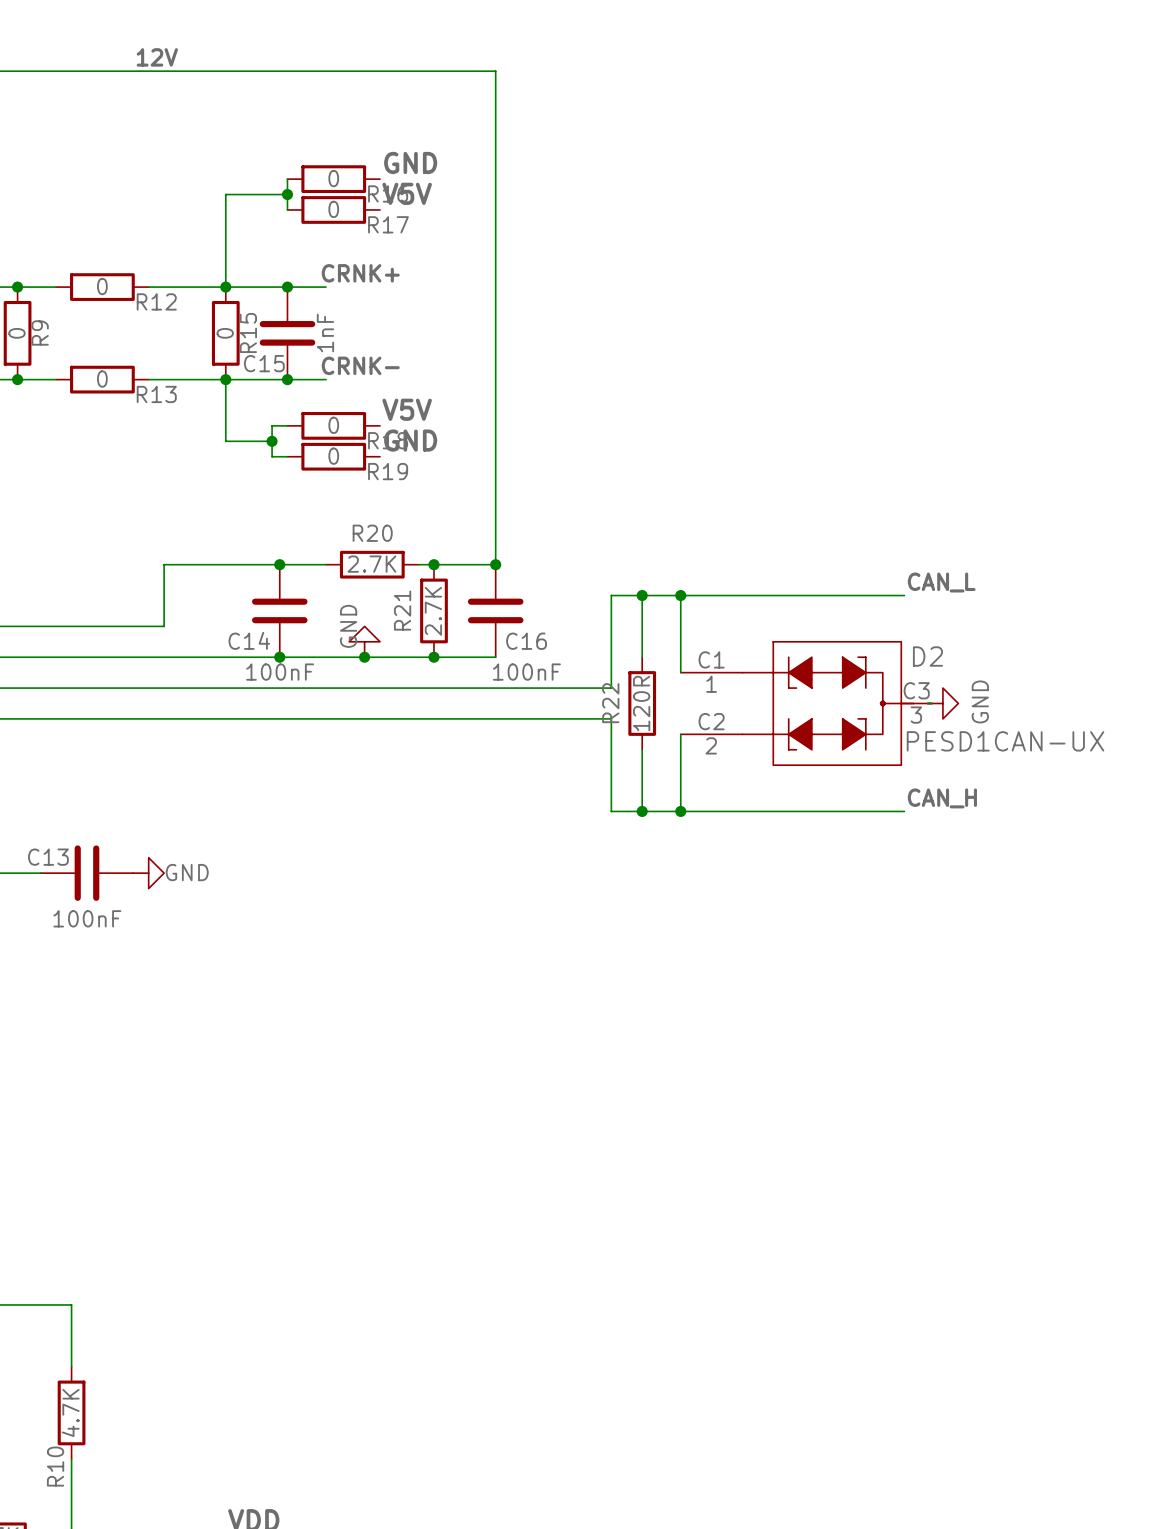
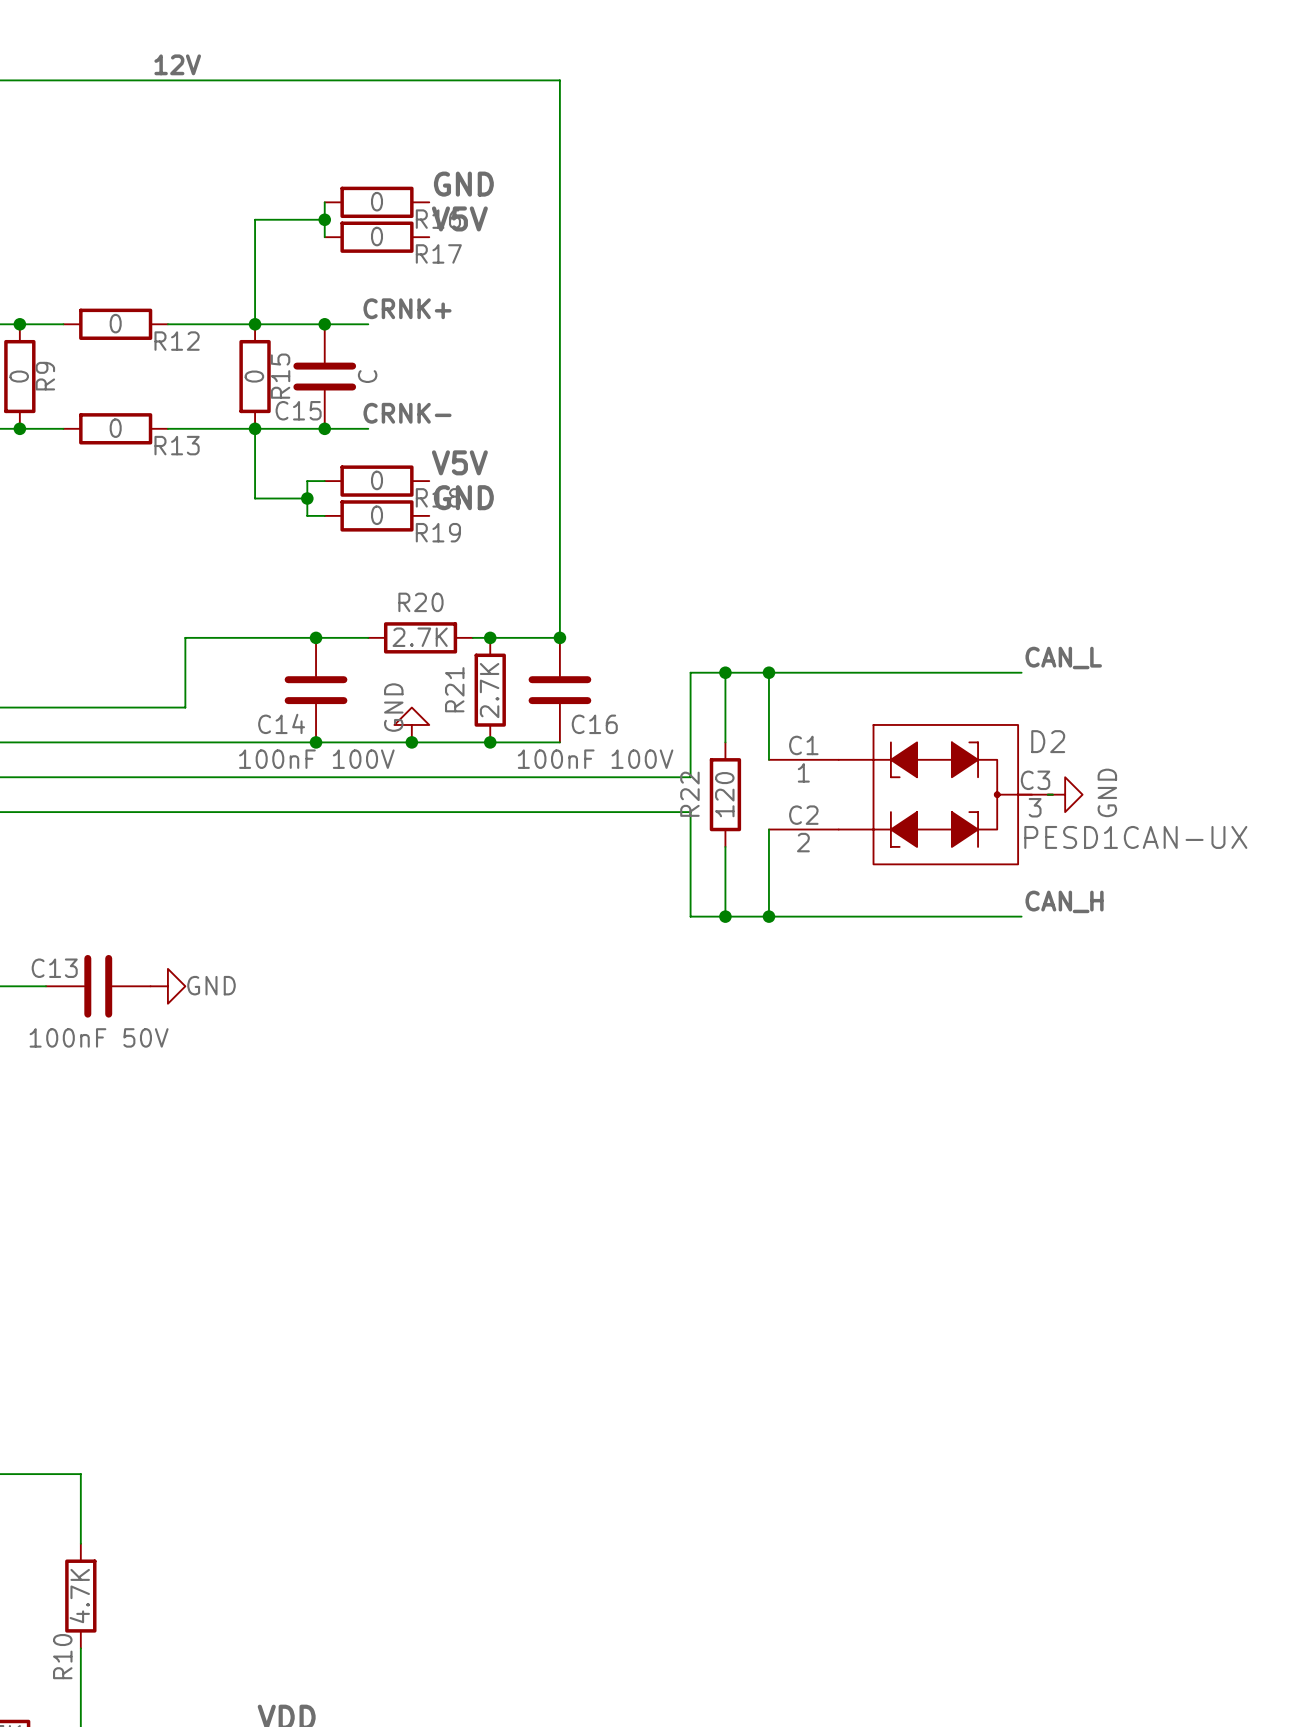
C15 value: 1nF (325, 332) -> C (367, 376)
C14 value: 100nF (280, 672) -> 100nF 100V (316, 759)
C16 value: 100nF (526, 672) -> 100nF 100V (595, 759)
R22 value: 120R (641, 703) -> 120 (724, 794)
C13 value: 100nF (87, 918) -> 100nF 50V (99, 1037)

